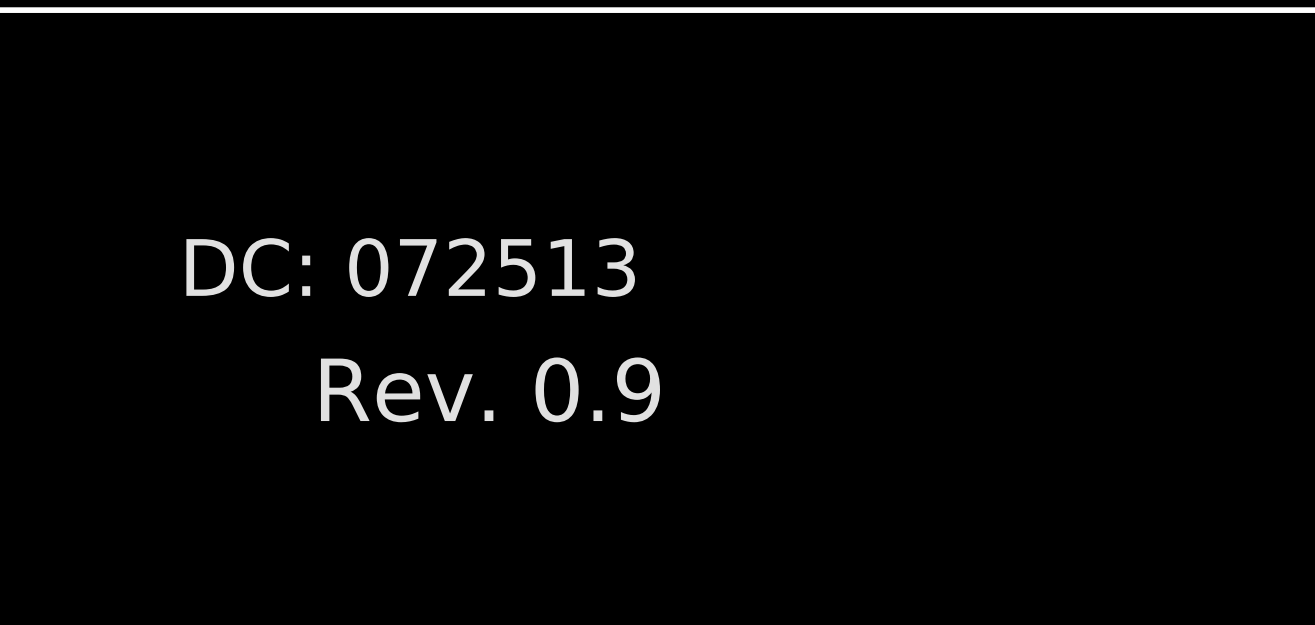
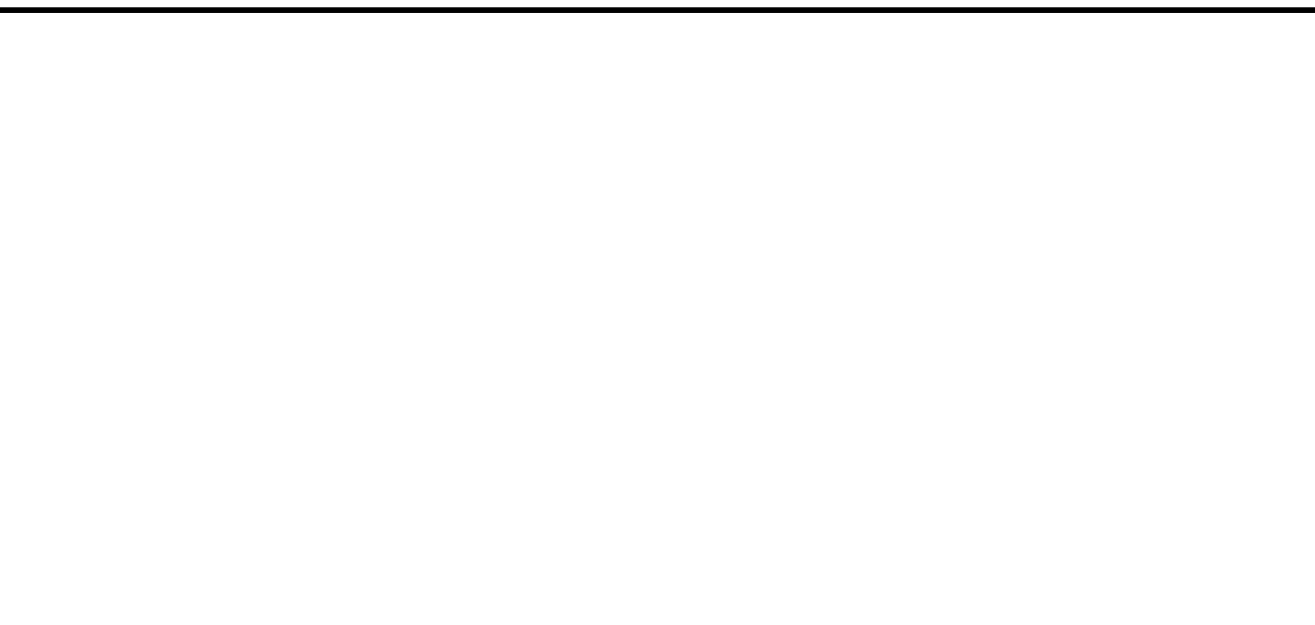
text: DC: 072513 (410, 267) -> none
text: Rev. 0.9 (490, 389) -> none

